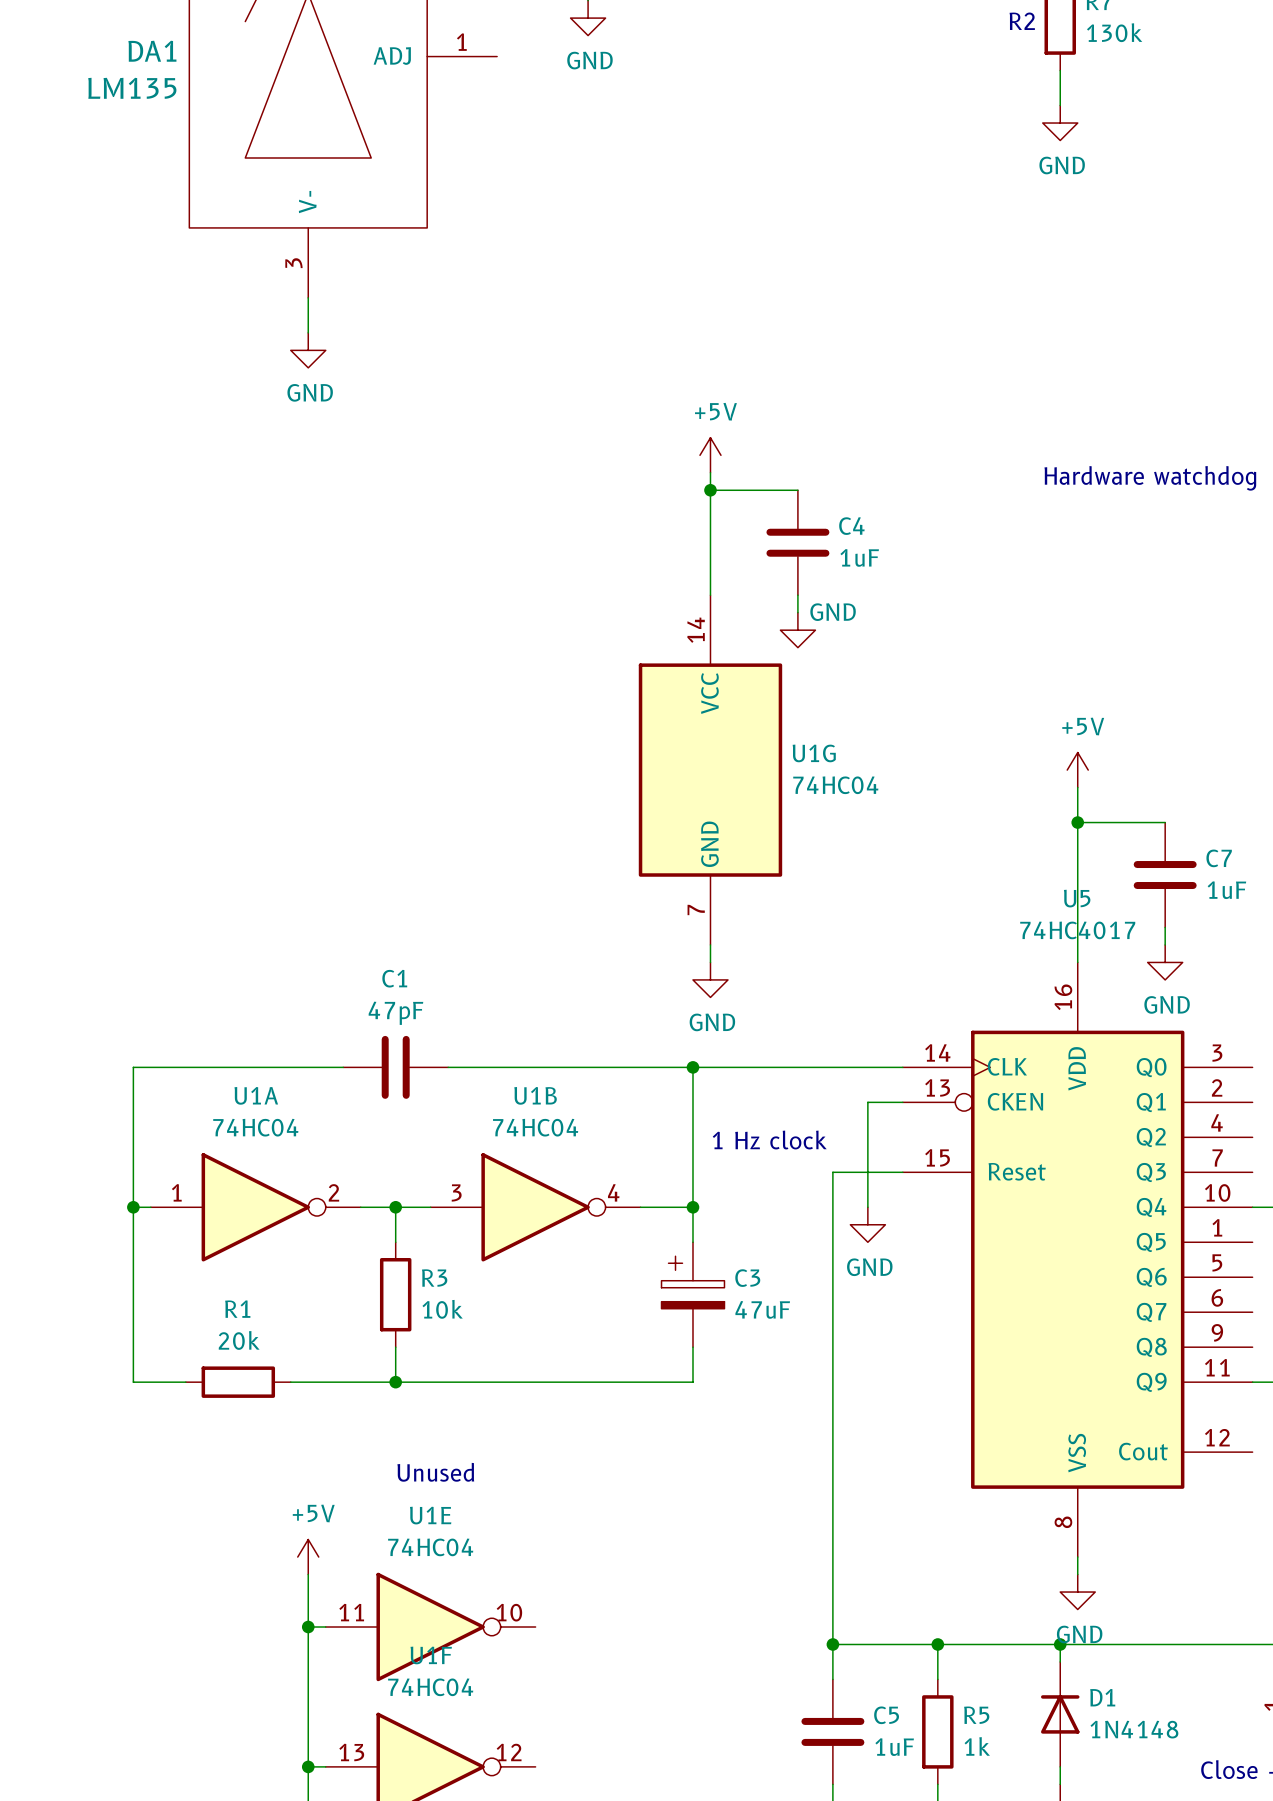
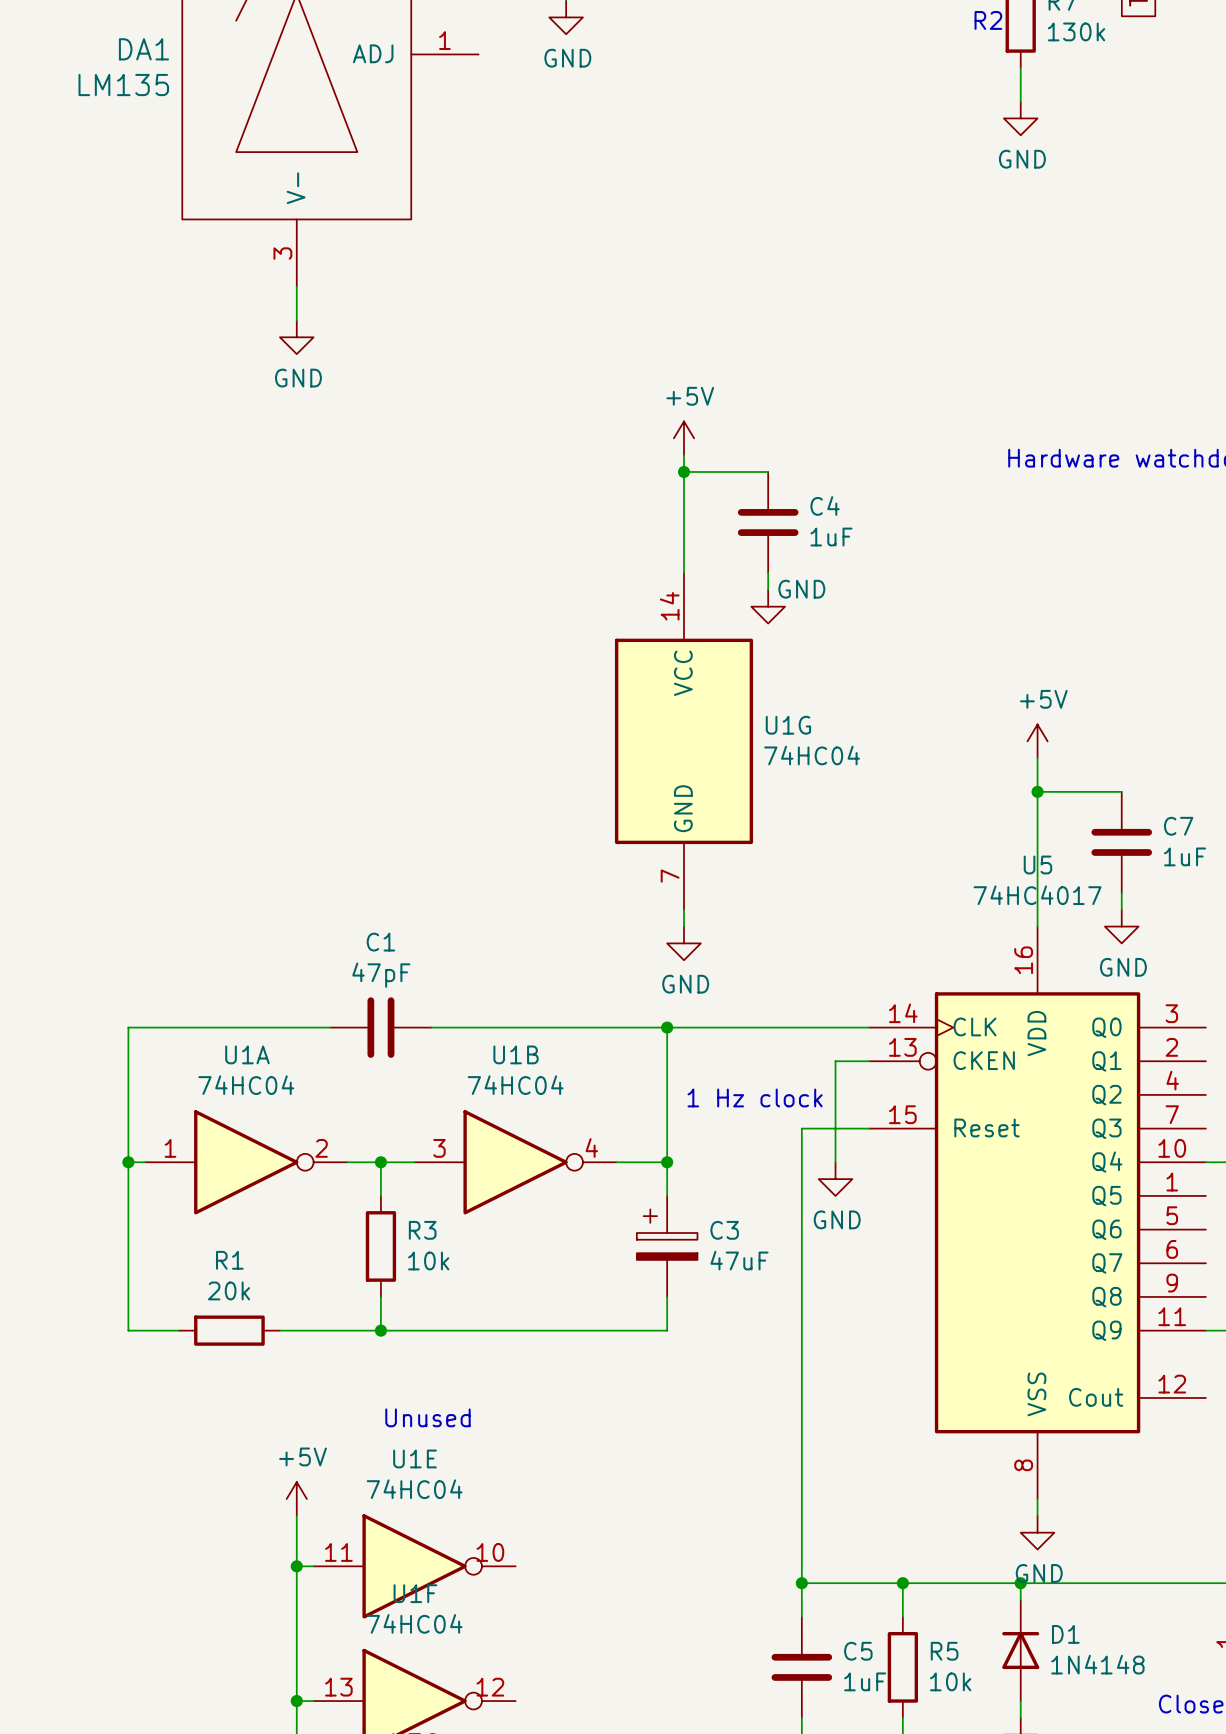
R5 value: 1k (977, 1746) -> 10k (950, 1681)

